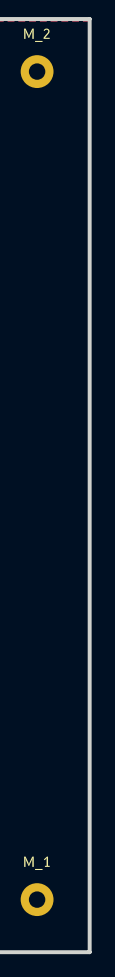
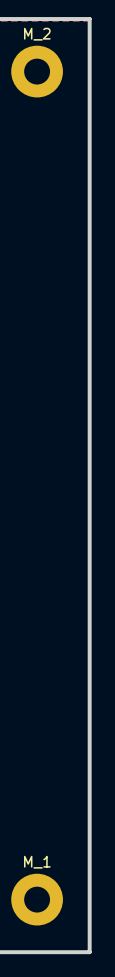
M_2 footprint: [20, 55, 54, 89] -> [11, 45, 63, 98]
M_1 footprint: [20, 883, 54, 917] -> [11, 873, 63, 926]

